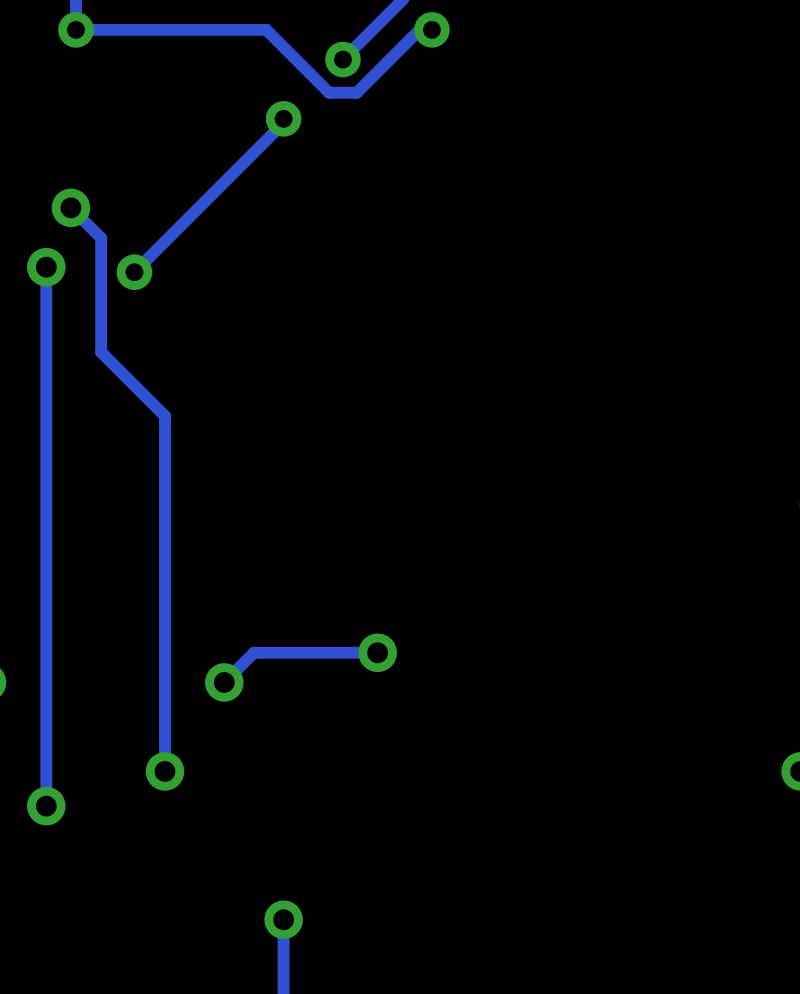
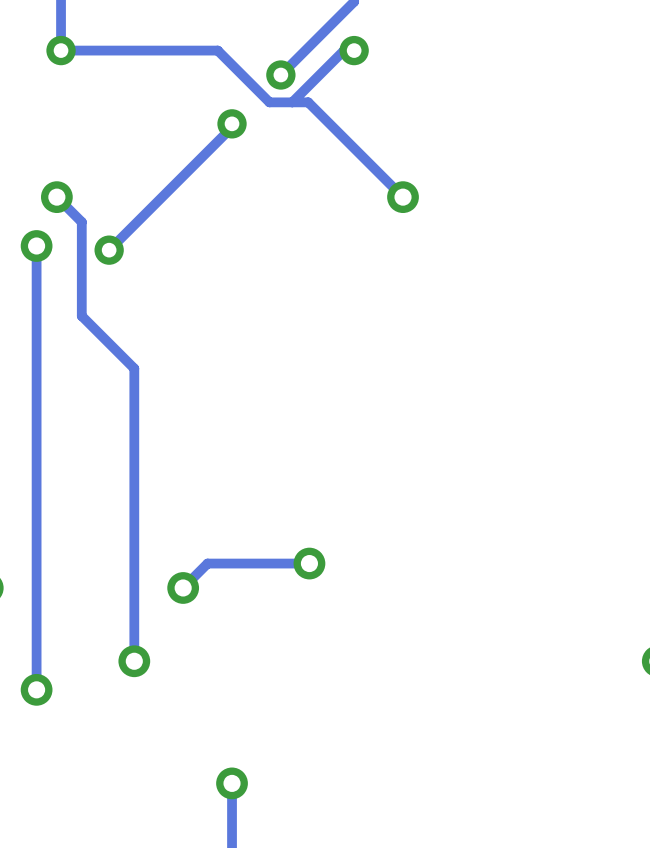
track: none -> (292, 102) (308, 102) (403, 197)
via: none -> (403, 197)

